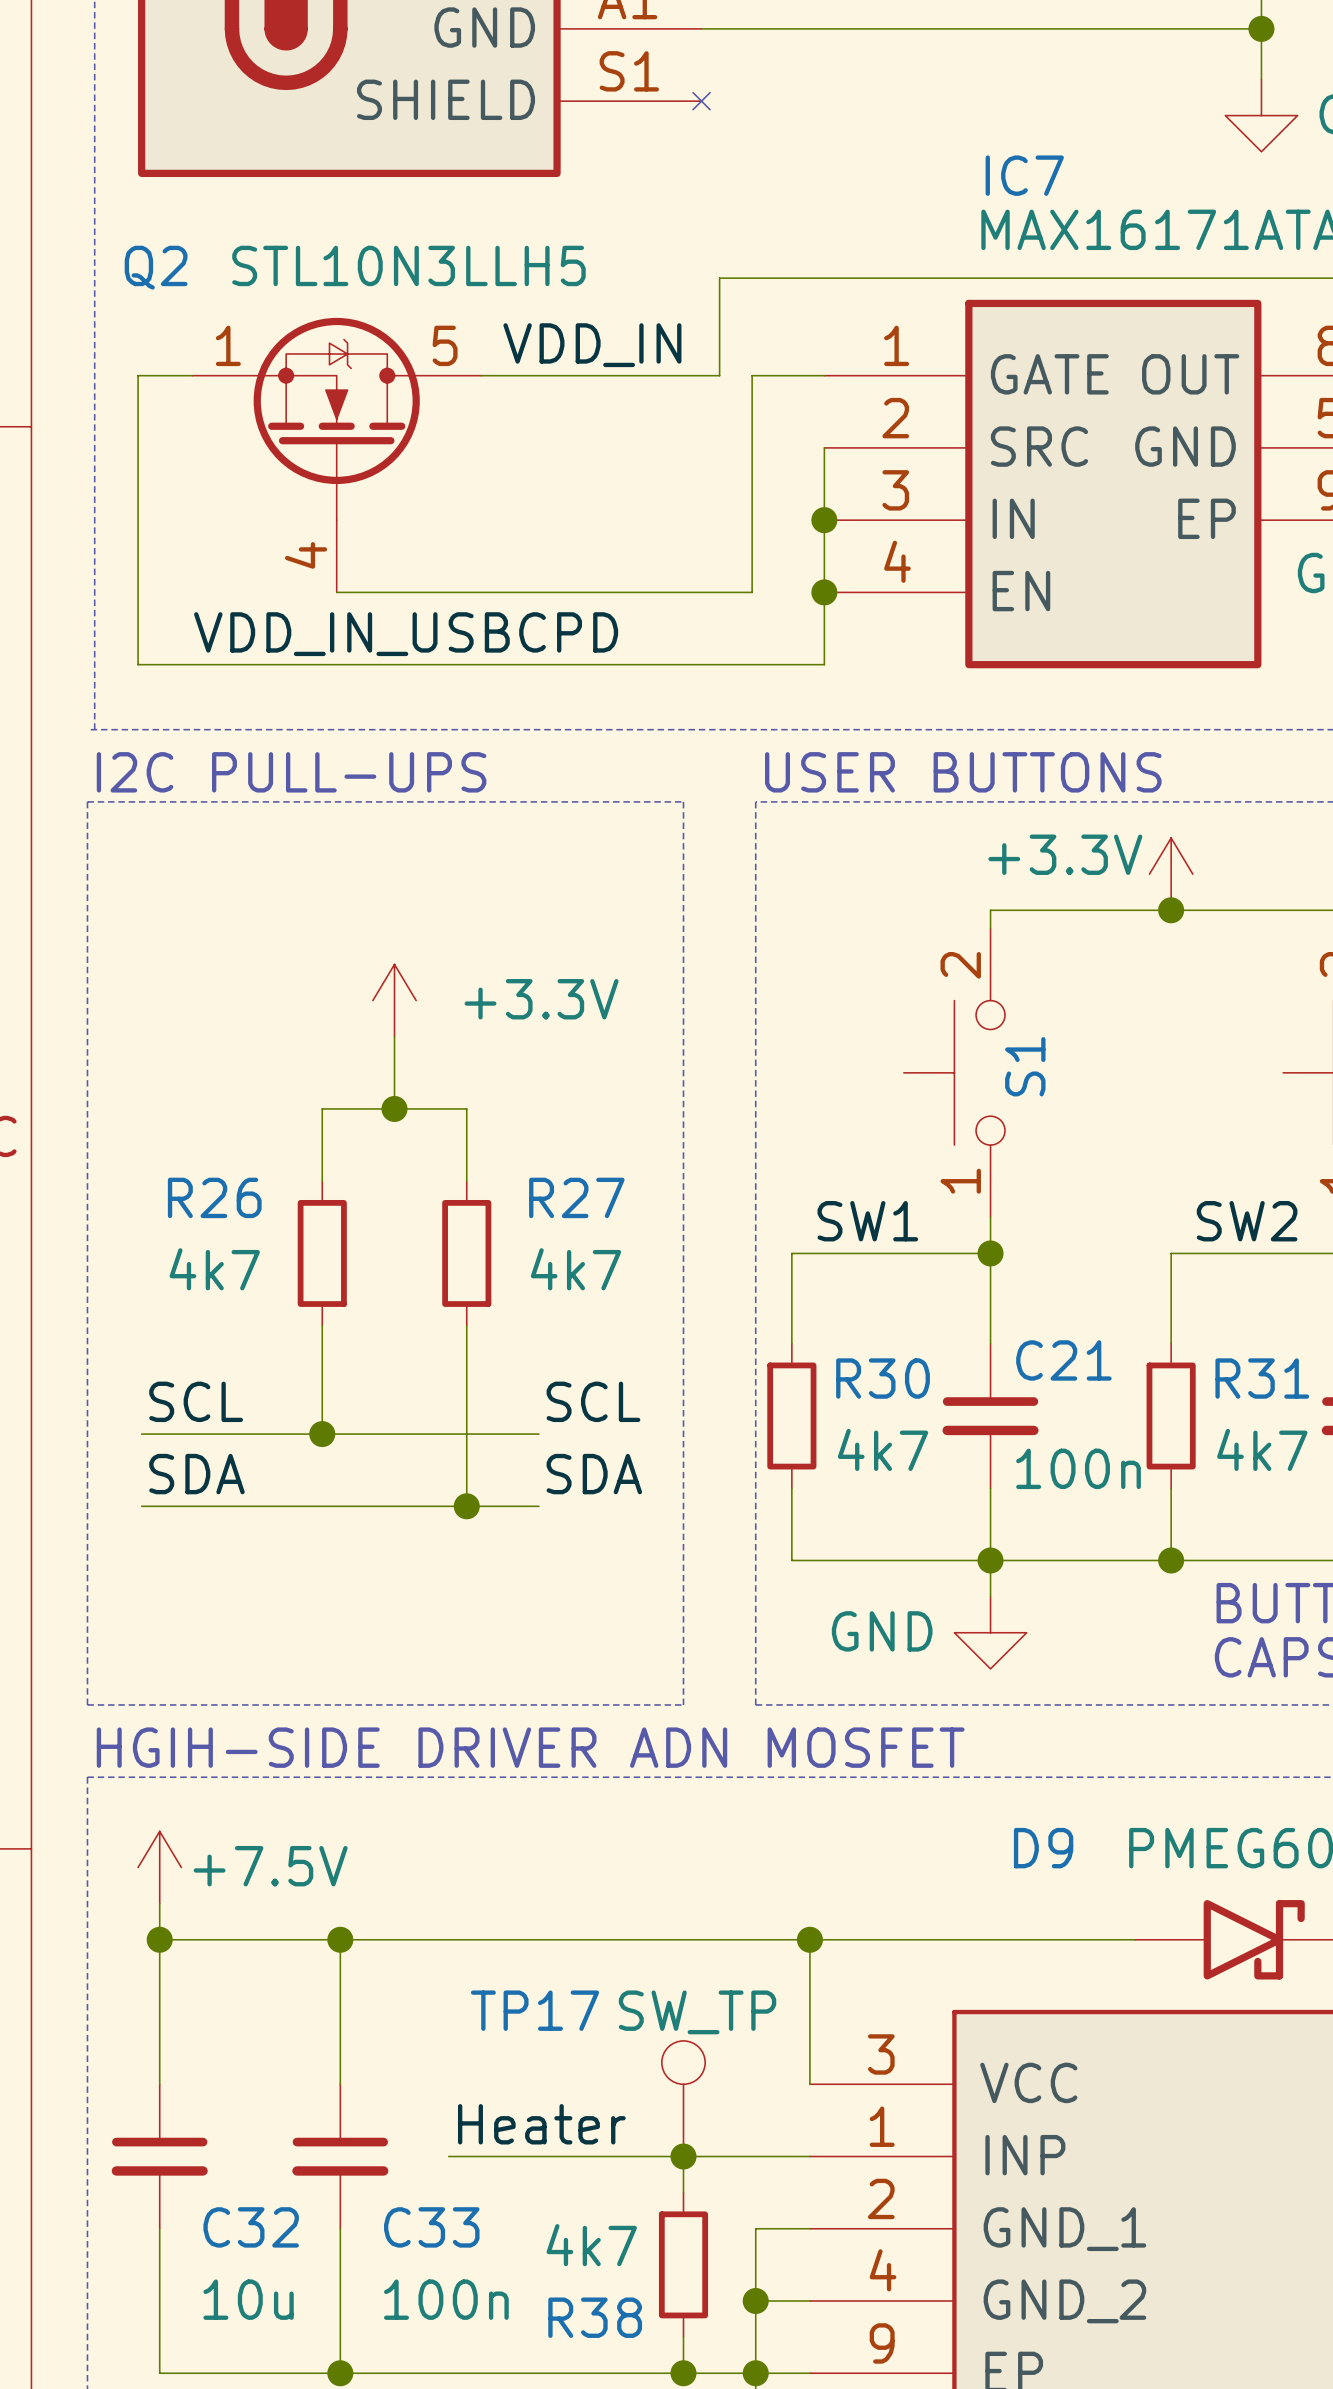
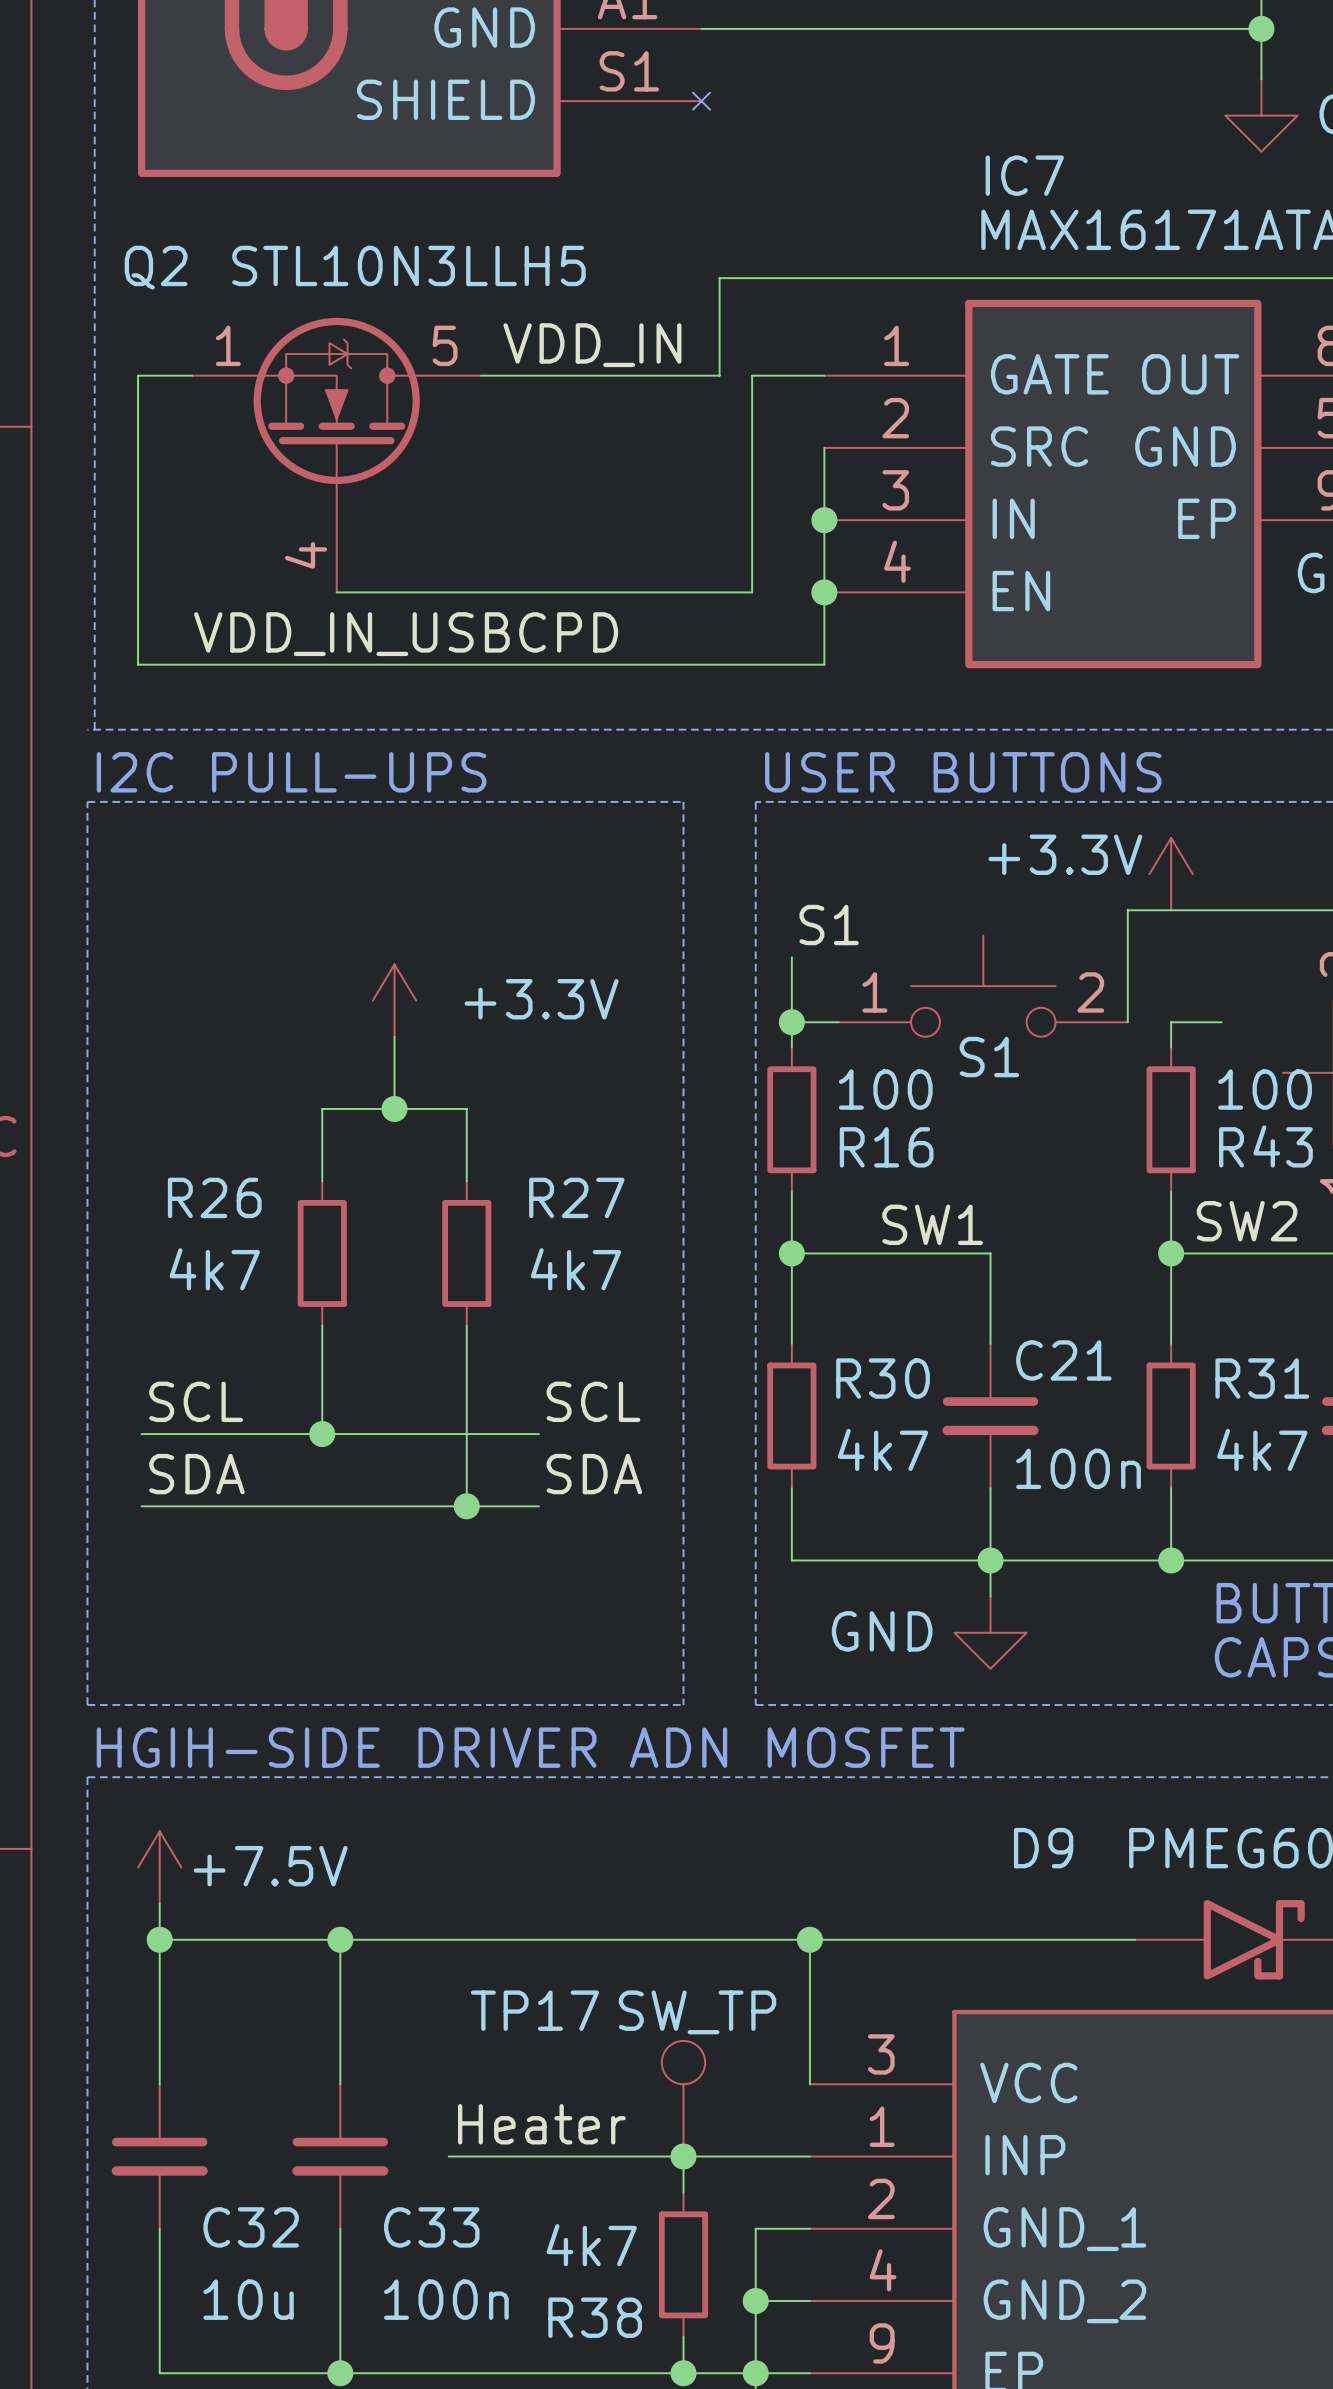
wire: (1127, 910) (990, 910) (990, 928) -> (1127, 910) (1127, 1022)
junction: (1171, 910) -> none
label: none -> S1 (829, 925)
wire: none -> (791, 957) (791, 1047)
wire: none -> (791, 1022) (838, 1022)
junction: none -> (791, 1022)
wire: none -> (1221, 1022) (1171, 1022) (1171, 1047)
S1 rotation: 0° (954, 1072) -> 90° clockwise (983, 986)
R16: none -> 100 (791, 1119)
R43: none -> 100 (1171, 1119)
wire: none -> (791, 1192) (791, 1253)
wire: none -> (1171, 1192) (1171, 1253)
wire: (990, 1217) (990, 1253) -> none
label position: SW1 (867, 1221) -> SW1 (932, 1224)
junction: none -> (791, 1253)
junction: (990, 1253) -> none
junction: none -> (1171, 1253)

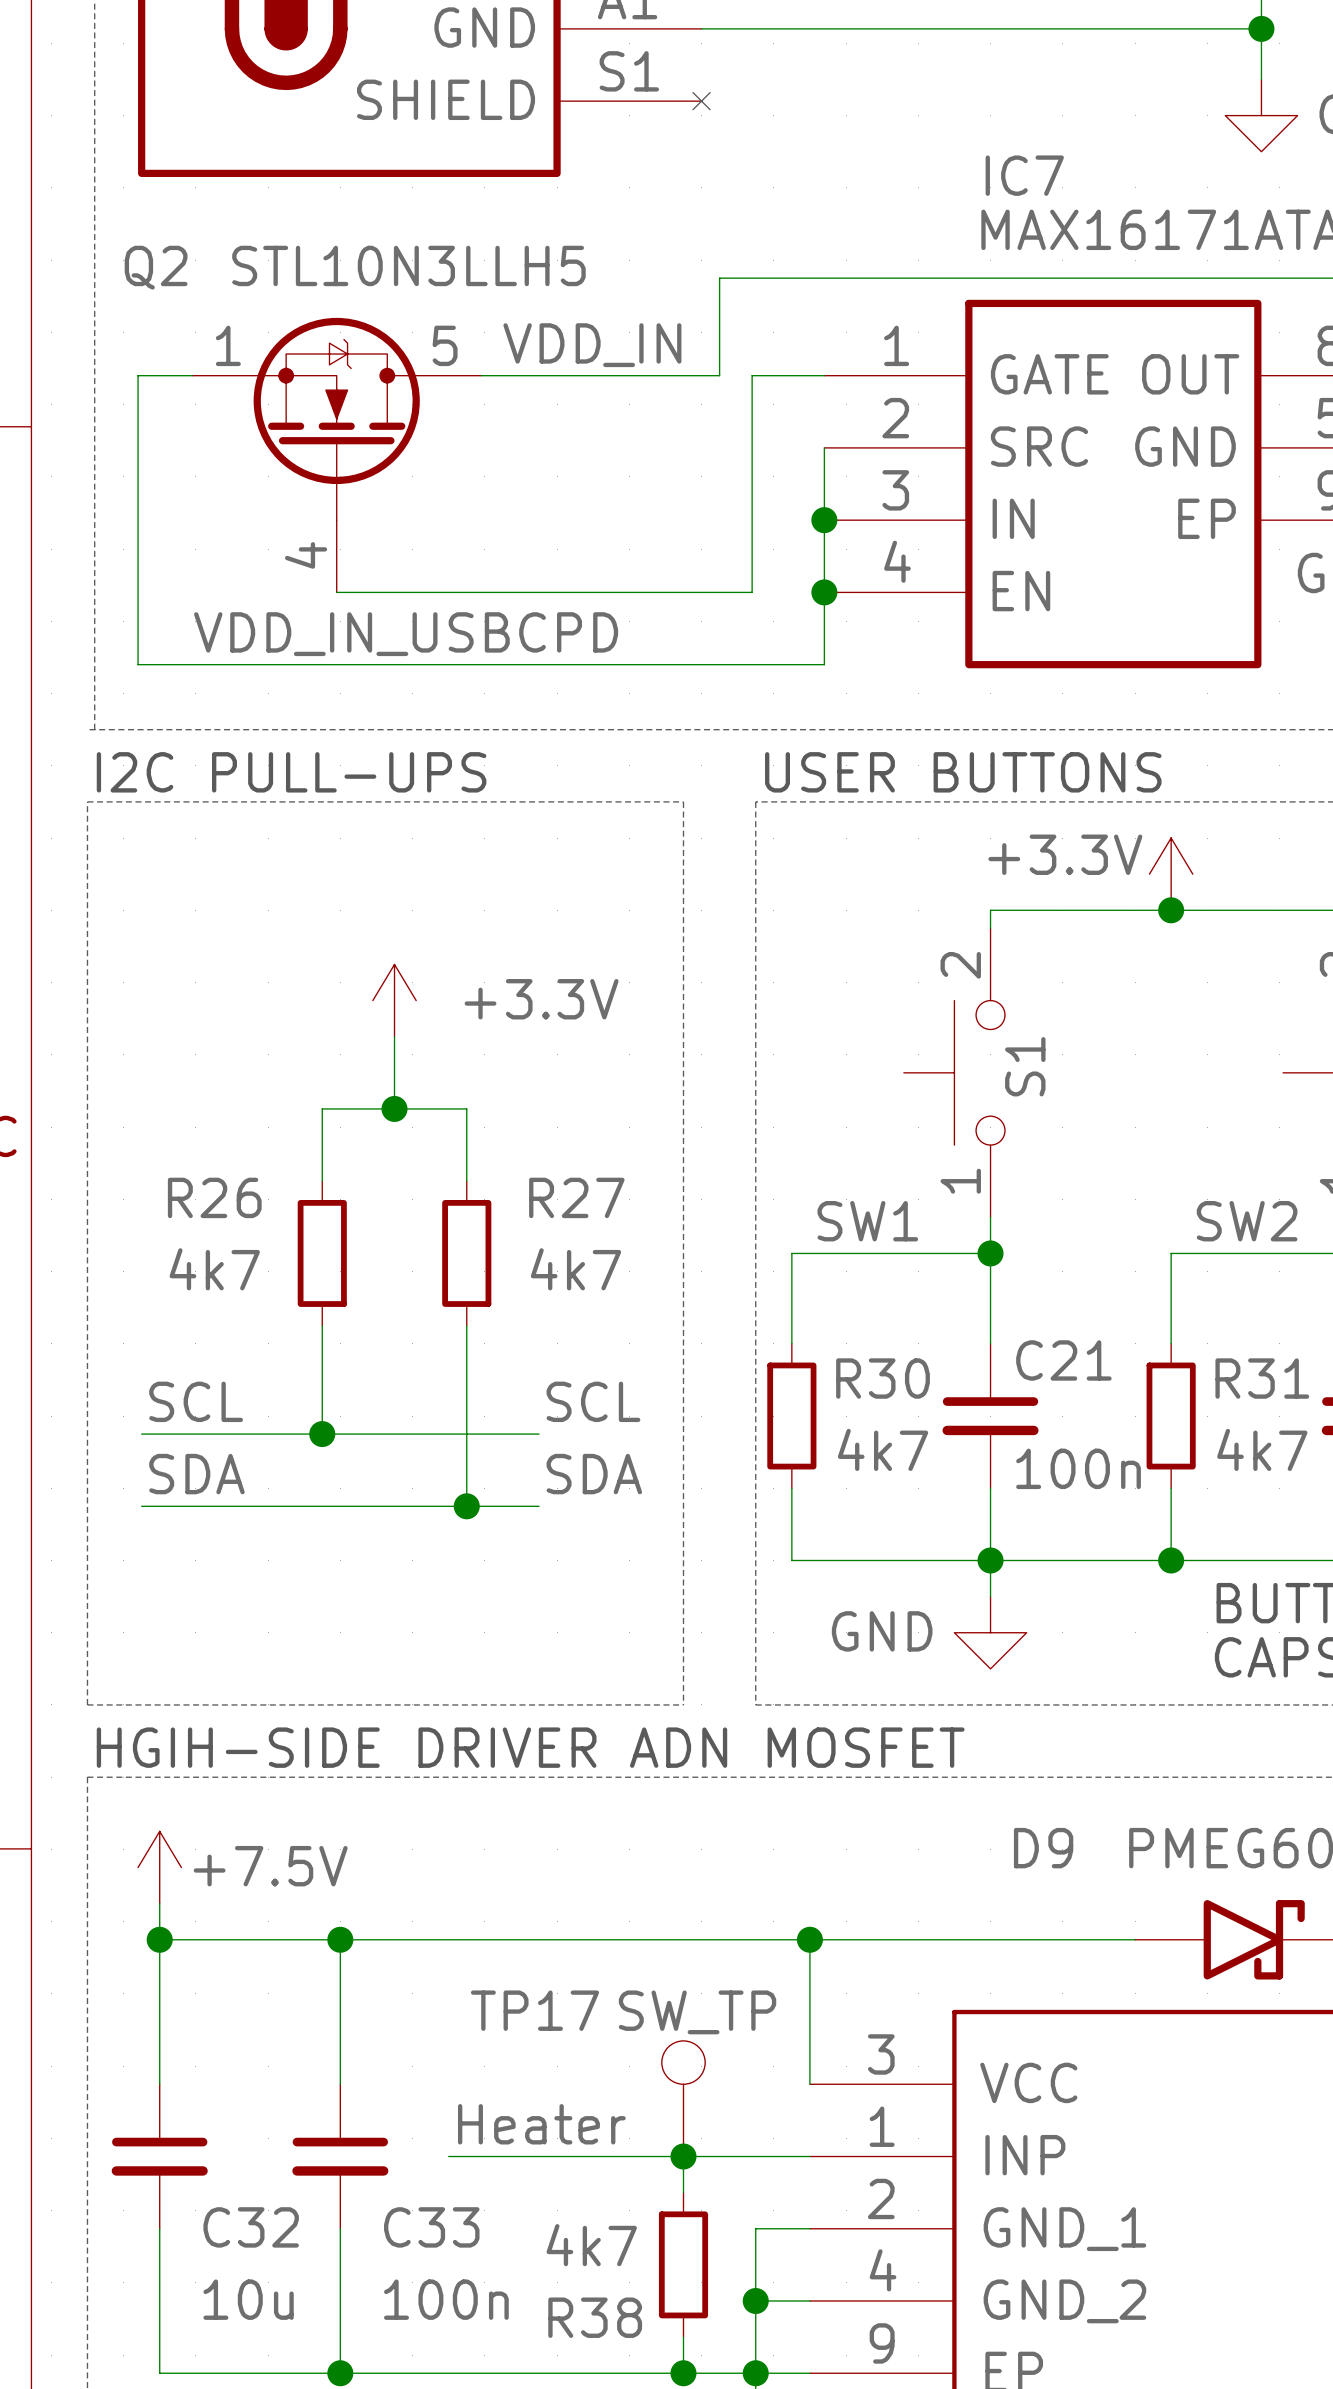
wire: (1127, 910) (1127, 1022) -> (1127, 910) (990, 910) (990, 928)
junction: none -> (1171, 910)
label: S1 (829, 925) -> none
wire: (791, 957) (791, 1047) -> none
S1 rotation: 0° (983, 986) -> 90° counterclockwise (954, 1072)
wire: (791, 1022) (838, 1022) -> none
junction: (791, 1022) -> none
wire: (1221, 1022) (1171, 1022) (1171, 1047) -> none
R16: 100 (791, 1119) -> none
R43: 100 (1171, 1119) -> none
wire: (791, 1192) (791, 1253) -> none
wire: (1171, 1192) (1171, 1253) -> none
wire: none -> (990, 1217) (990, 1253)
label position: SW1 (932, 1224) -> SW1 (867, 1221)
junction: (791, 1253) -> none
junction: none -> (990, 1253)
junction: (1171, 1253) -> none

